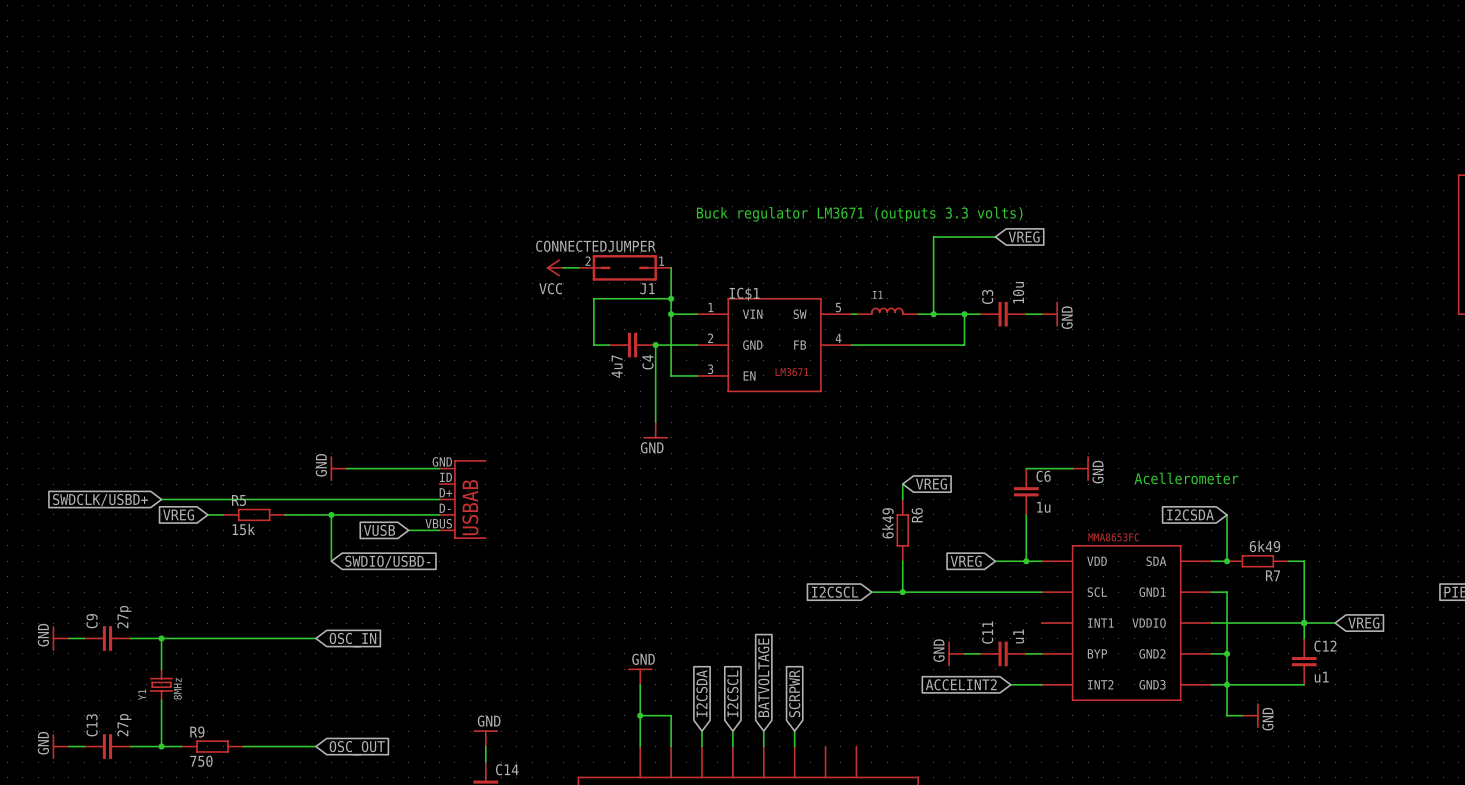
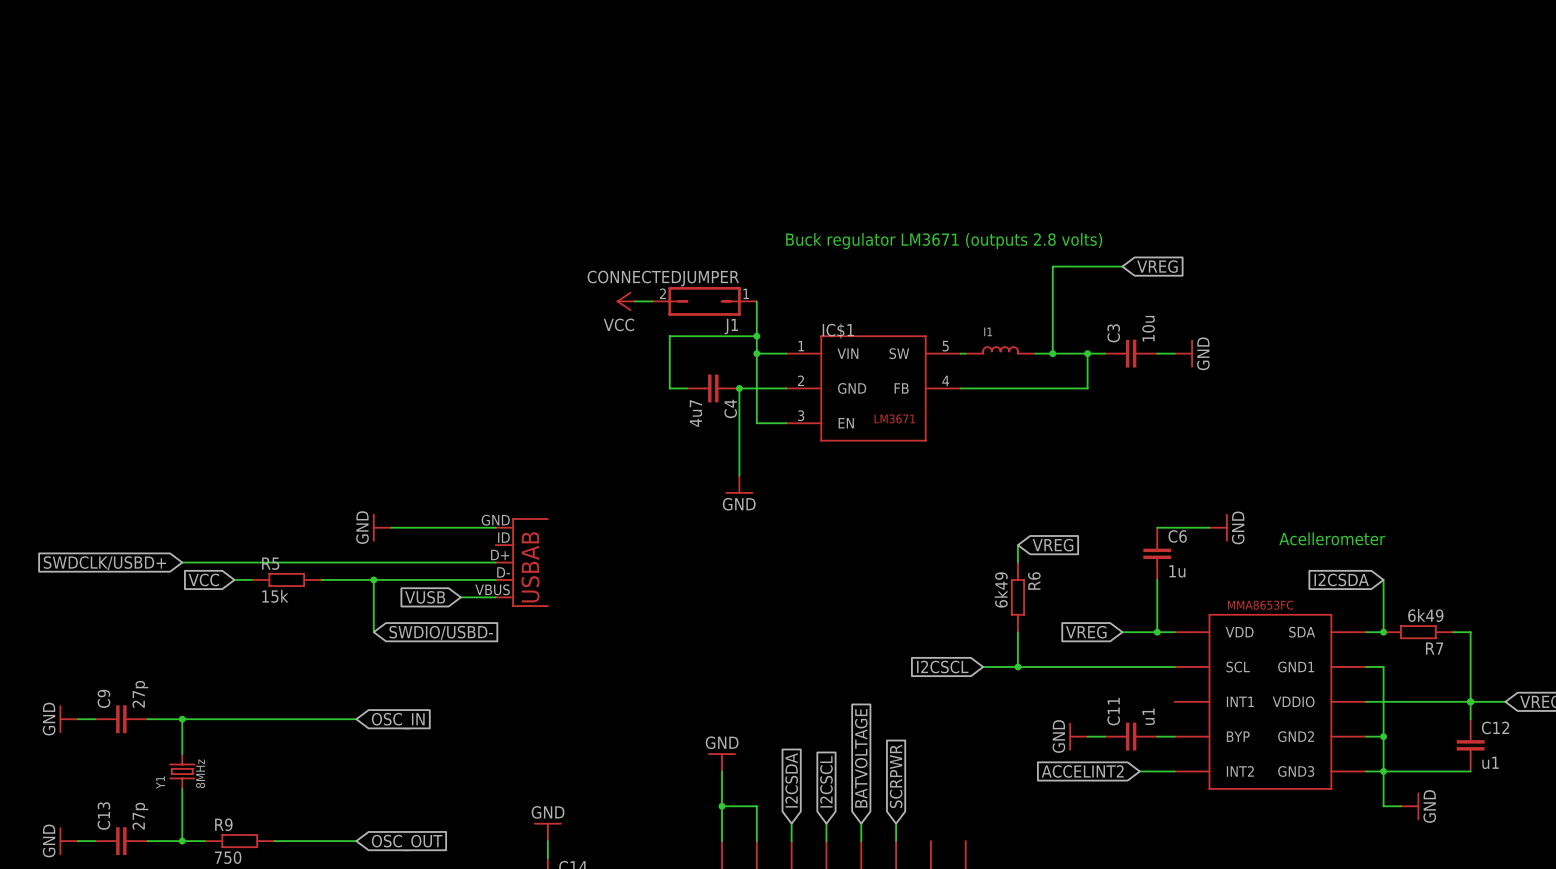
text: Buck regulator LM3671 (outputs 3.3 volts) (859, 214) -> Buck regulator LM3671 (outputs 2.8 volts) (944, 241)
global label: VREG (178, 514) -> VCC (203, 579)

